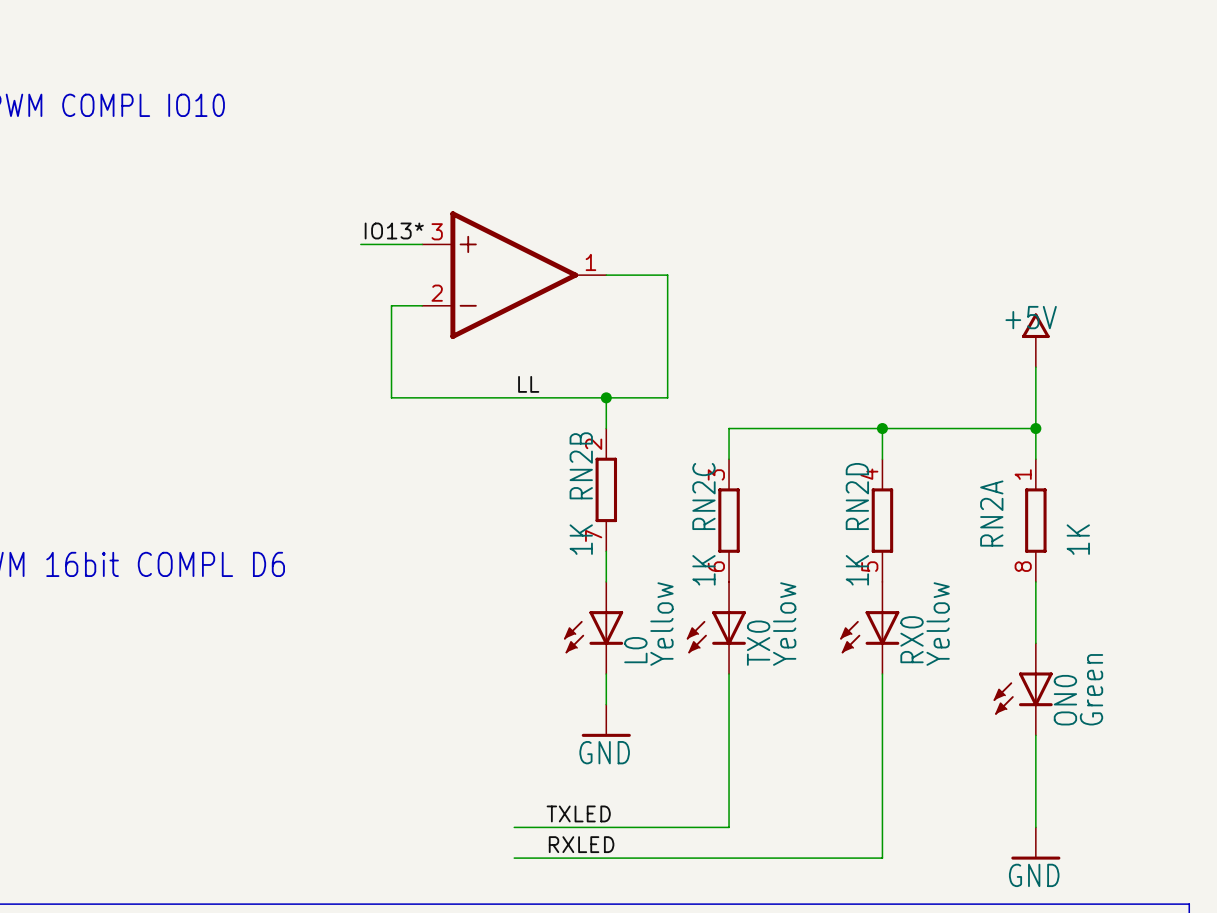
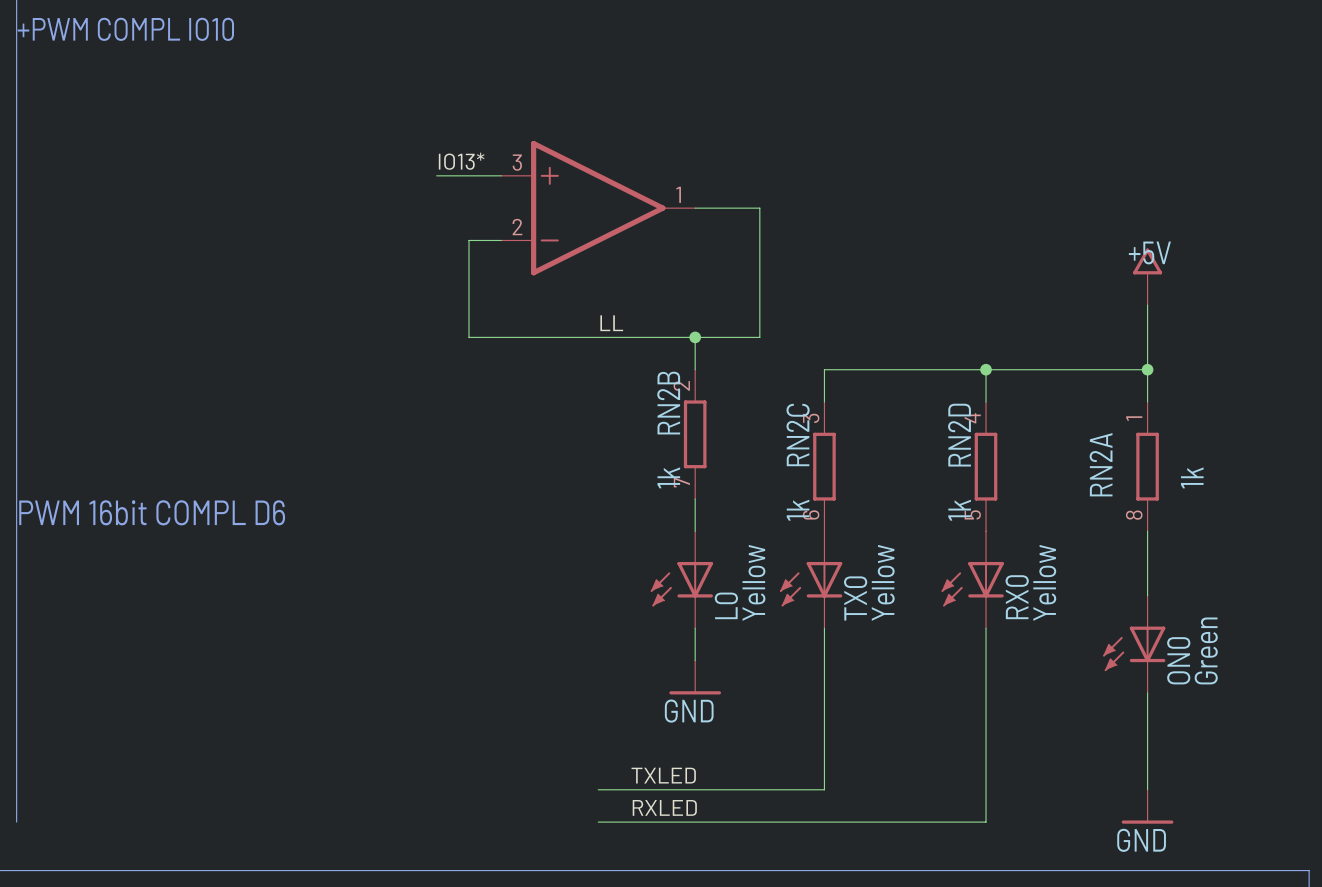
RN2B value: 1K (581, 539) -> 1k (668, 477)
RN2A value: 1K (1078, 539) -> 1k (1192, 477)
RN2C value: 1K (703, 570) -> 1k (798, 510)
RN2D value: 1K (857, 570) -> 1k (959, 510)

